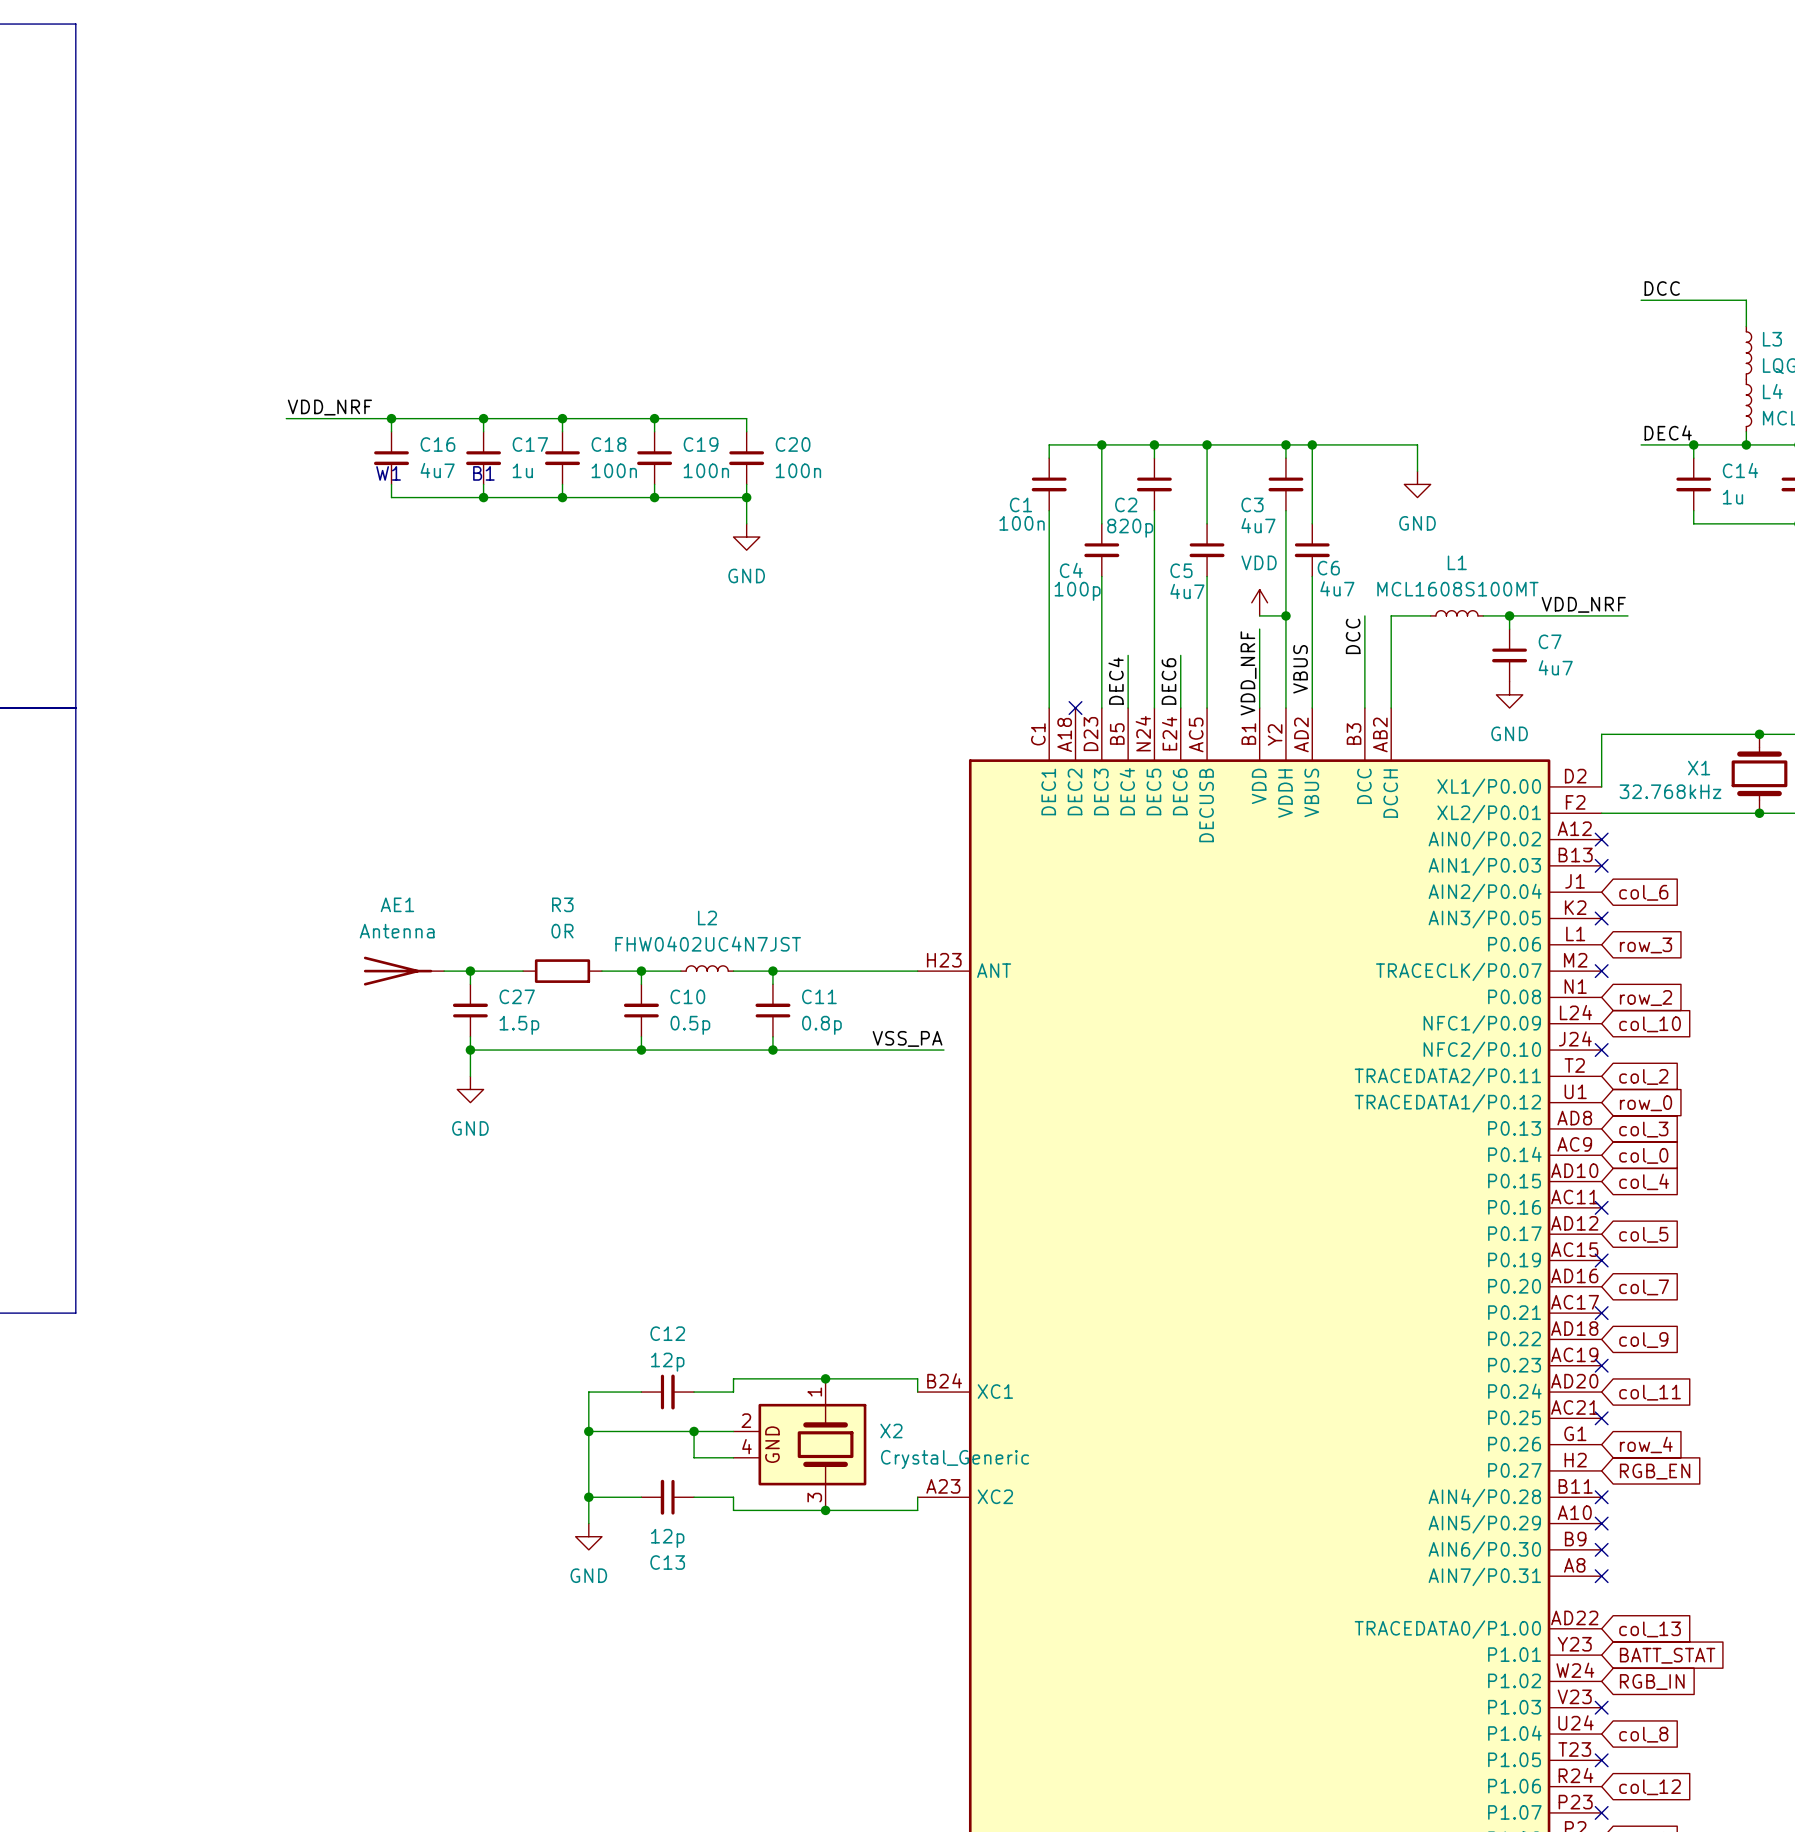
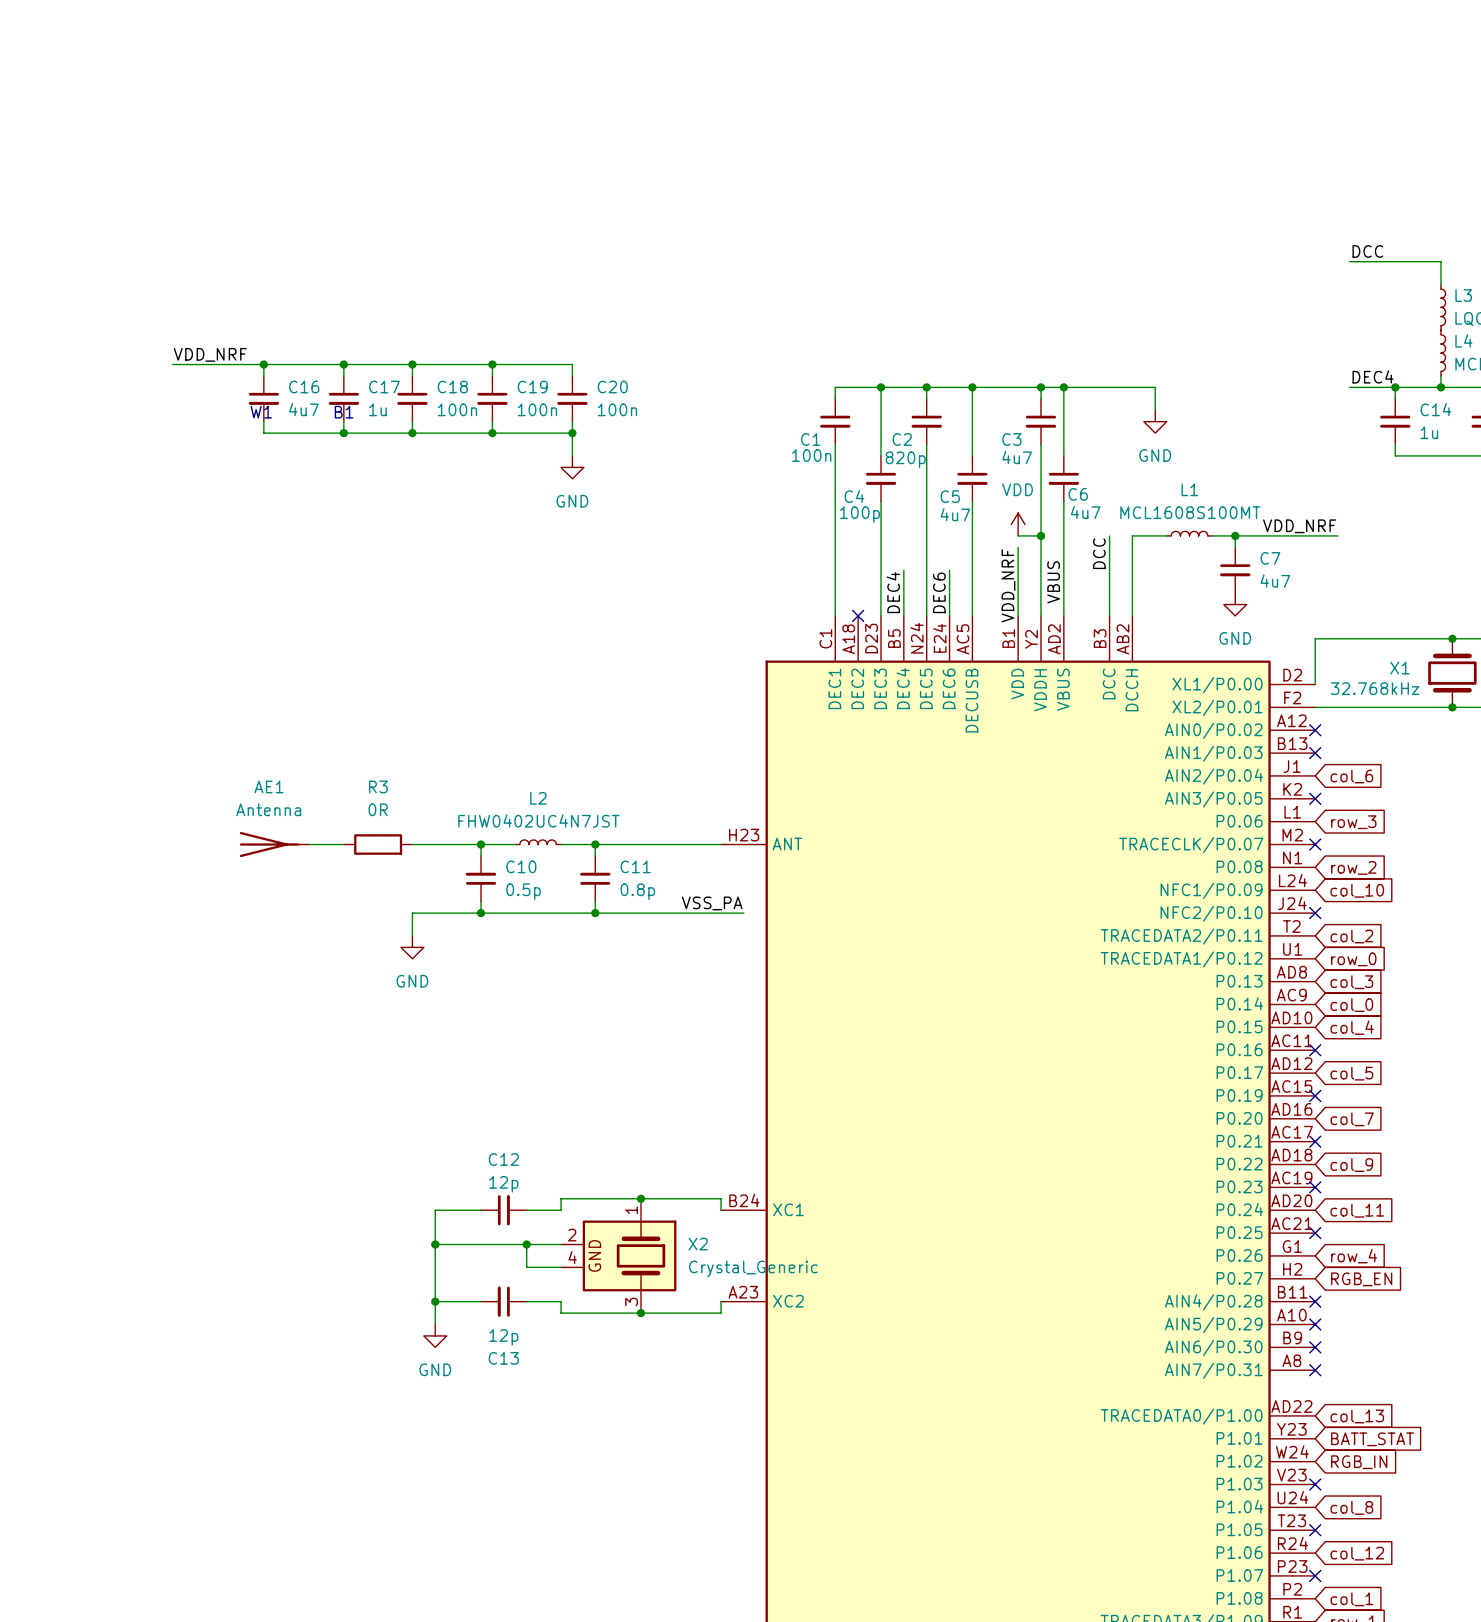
wire: (470, 971) (470, 984) -> none
junction: (470, 971) -> none
wire: (483, 971) (523, 971) -> (412, 844) (446, 844)
R3 position: (562, 971) -> (378, 844)
C27: 1.5p (470, 1010) -> none
wire: (470, 1036) (470, 1076) -> none
wire: (470, 1050) (562, 1050) -> (412, 935) (412, 913)
junction: (470, 1050) -> none
power symbol position: GND (470, 1089) -> GND (412, 947)

